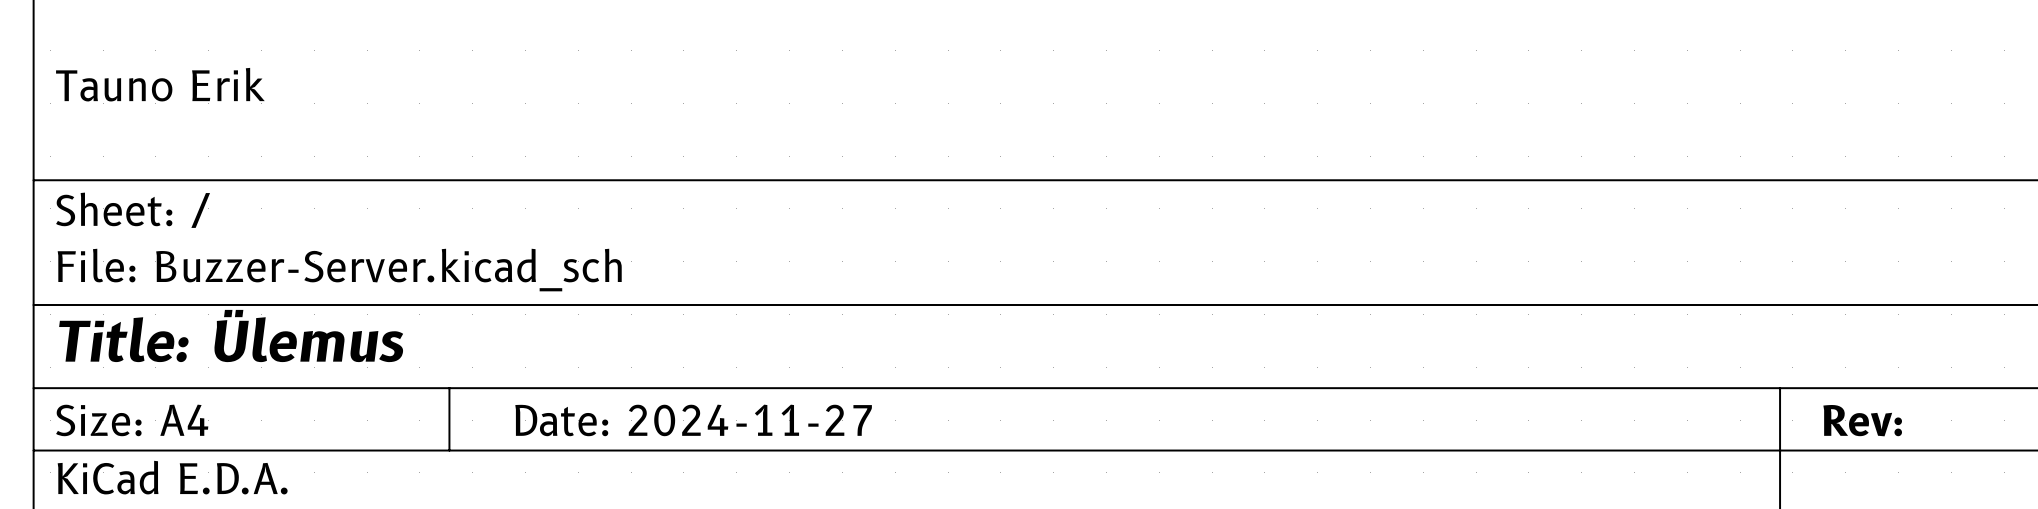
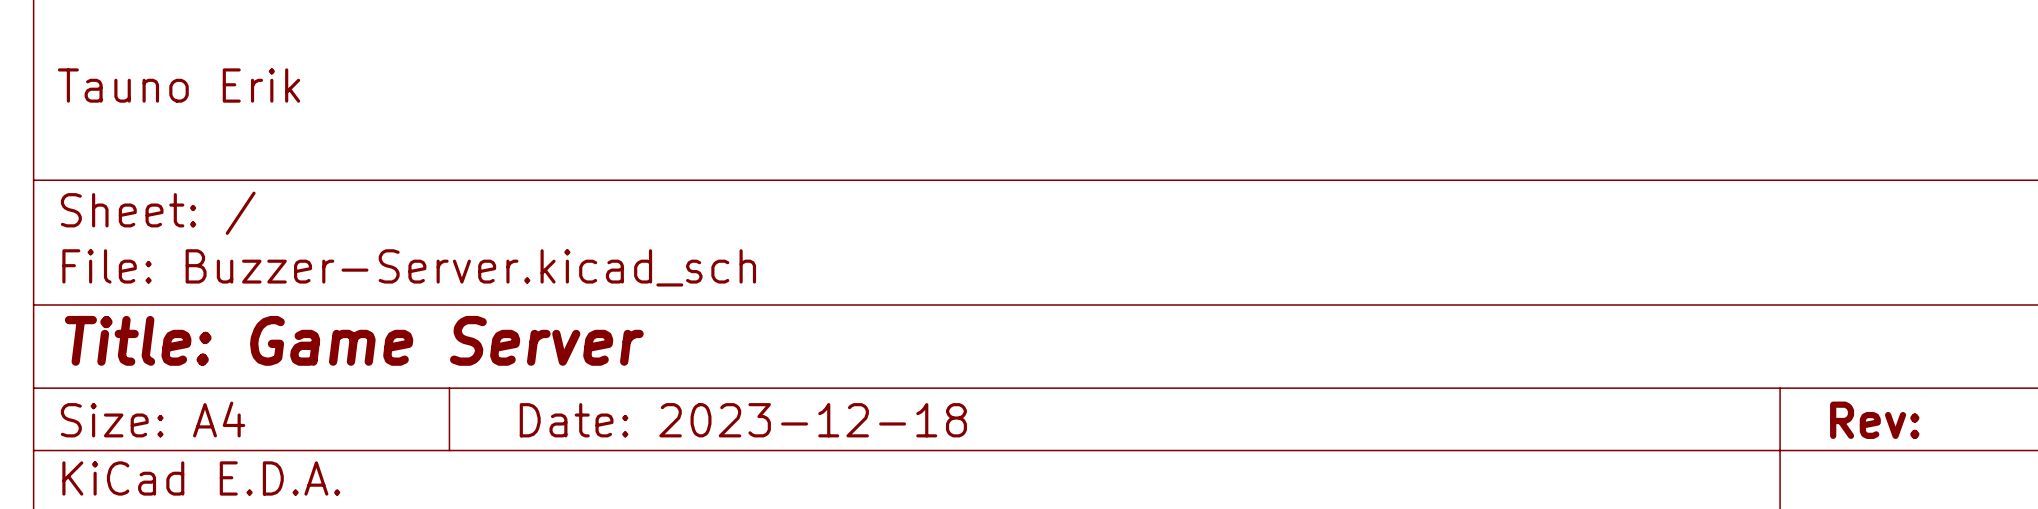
title block: Title: Ülemus (231, 336) -> Title: Game Server (354, 340)
title block: Date: 2024-11-27 (693, 420) -> Date: 2023-12-18 (743, 420)

